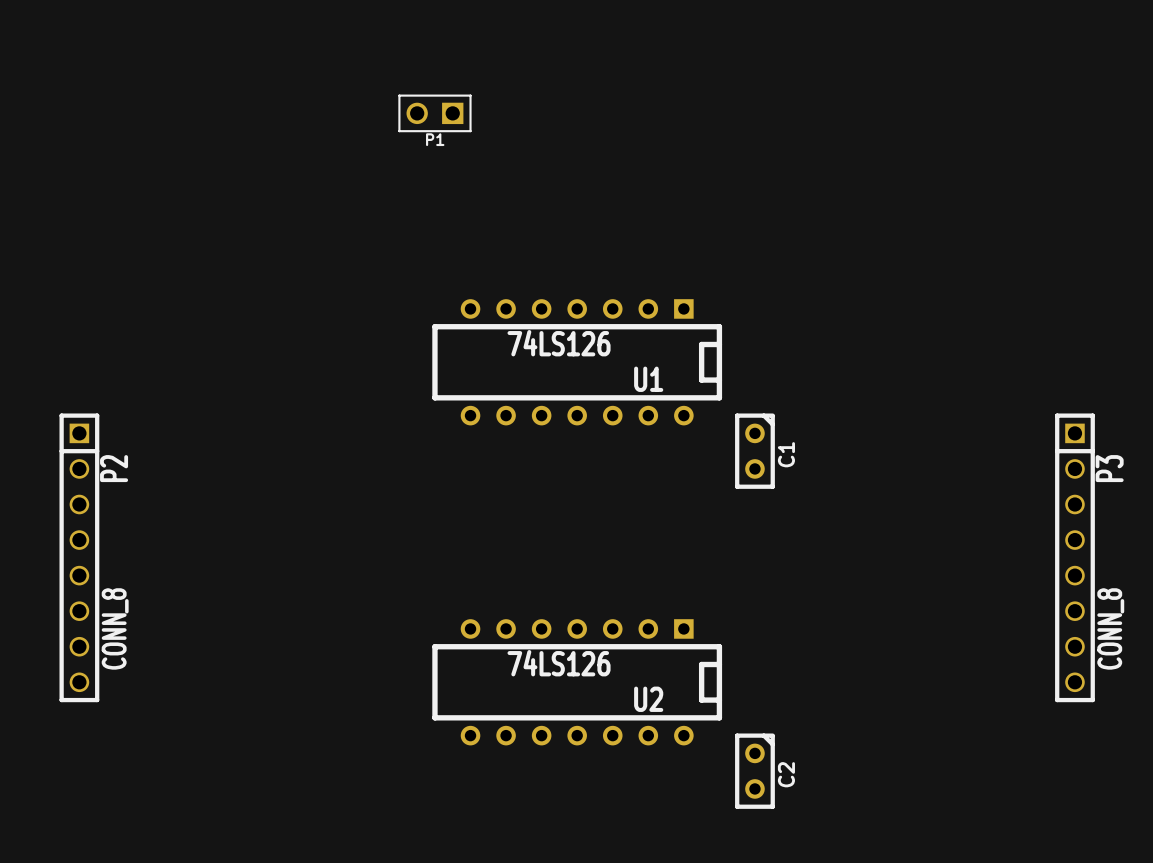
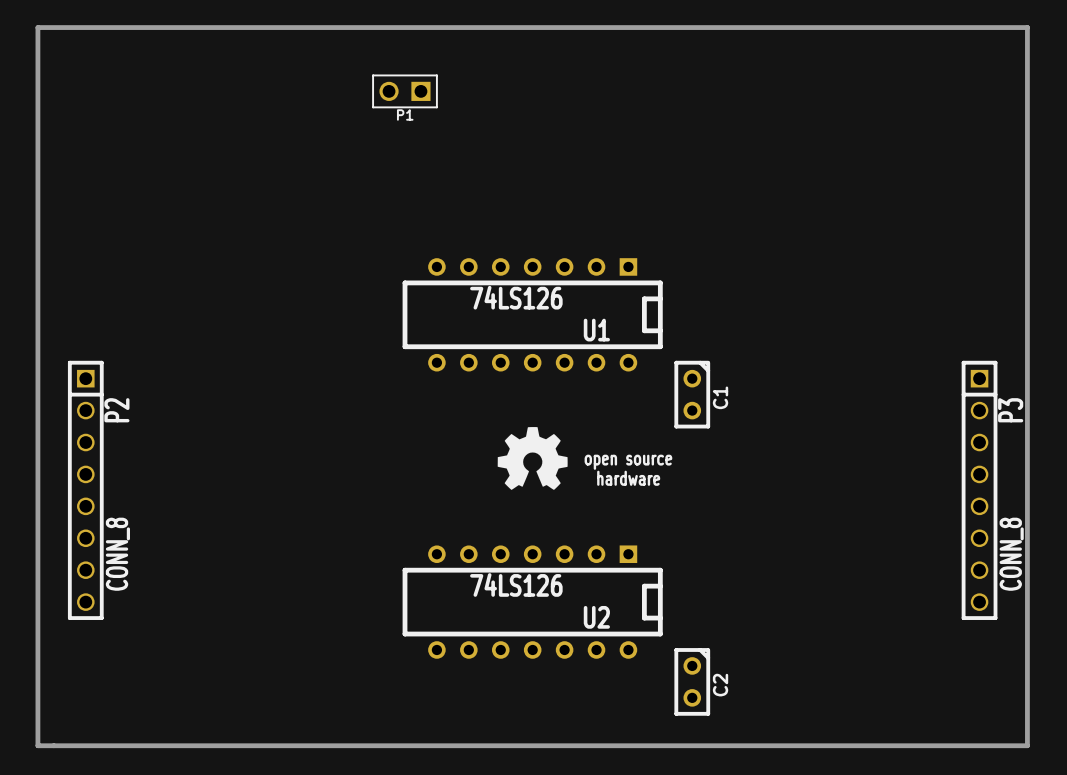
board edge: none -> (37, 27) (37, 745) (1027, 745) (1027, 27) (37, 27)
drawing: none -> [497, 427, 568, 490]
text: none -> open source (628, 462)
text: none -> hardware (628, 478)

